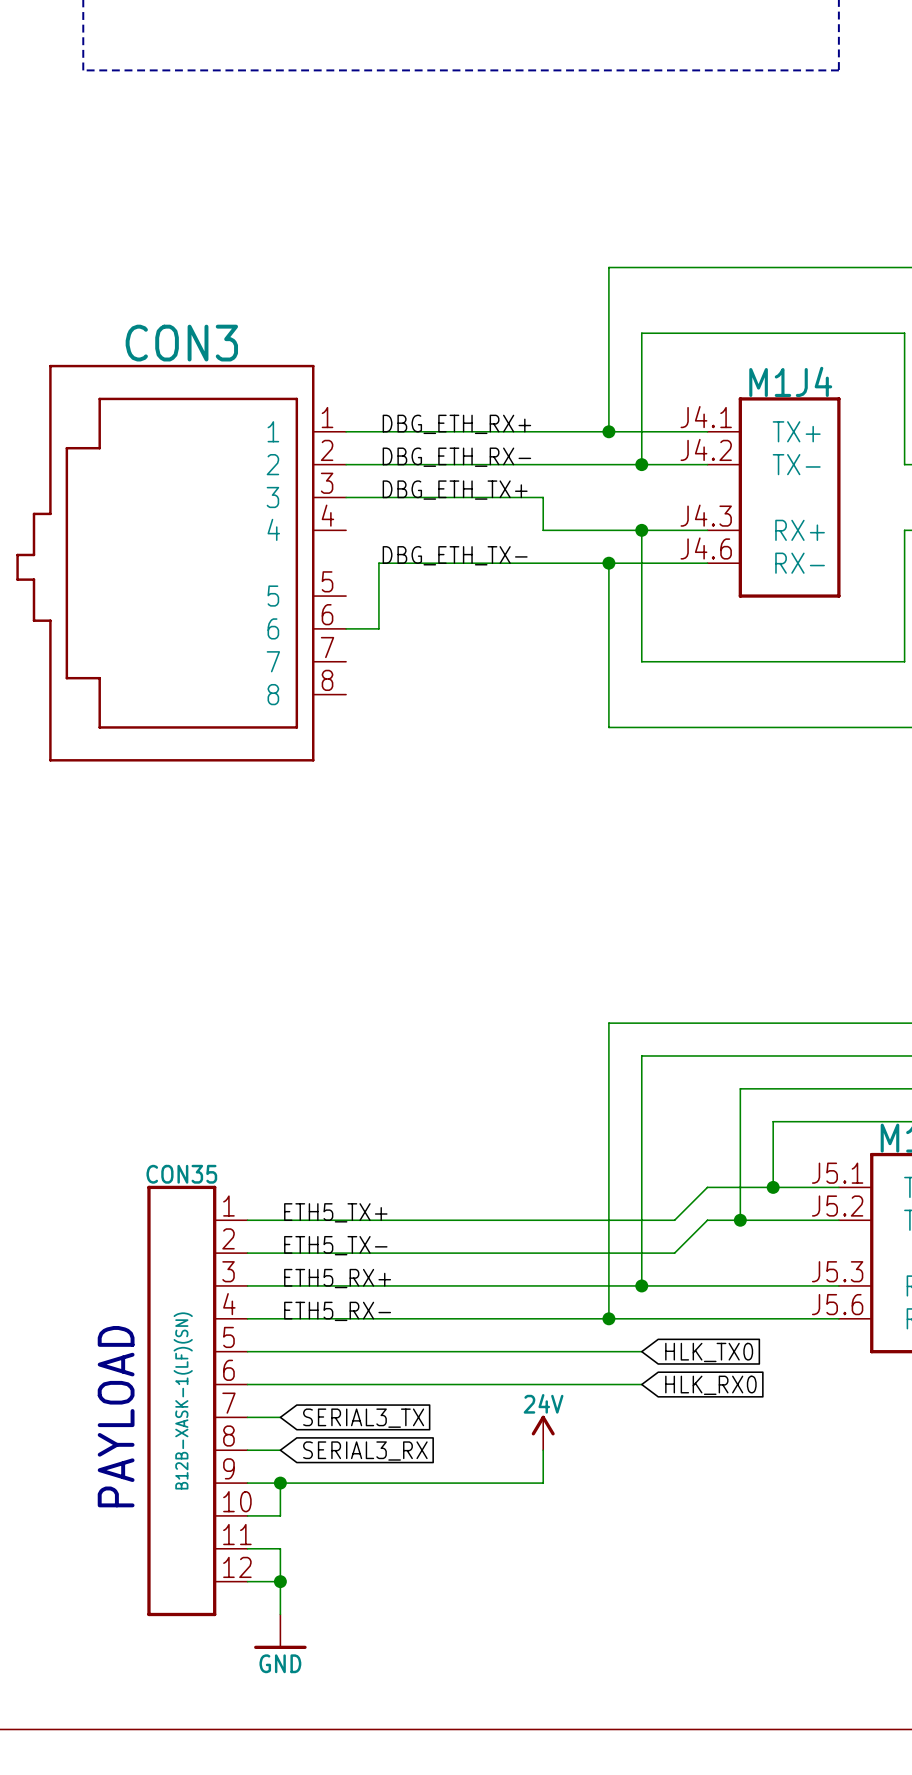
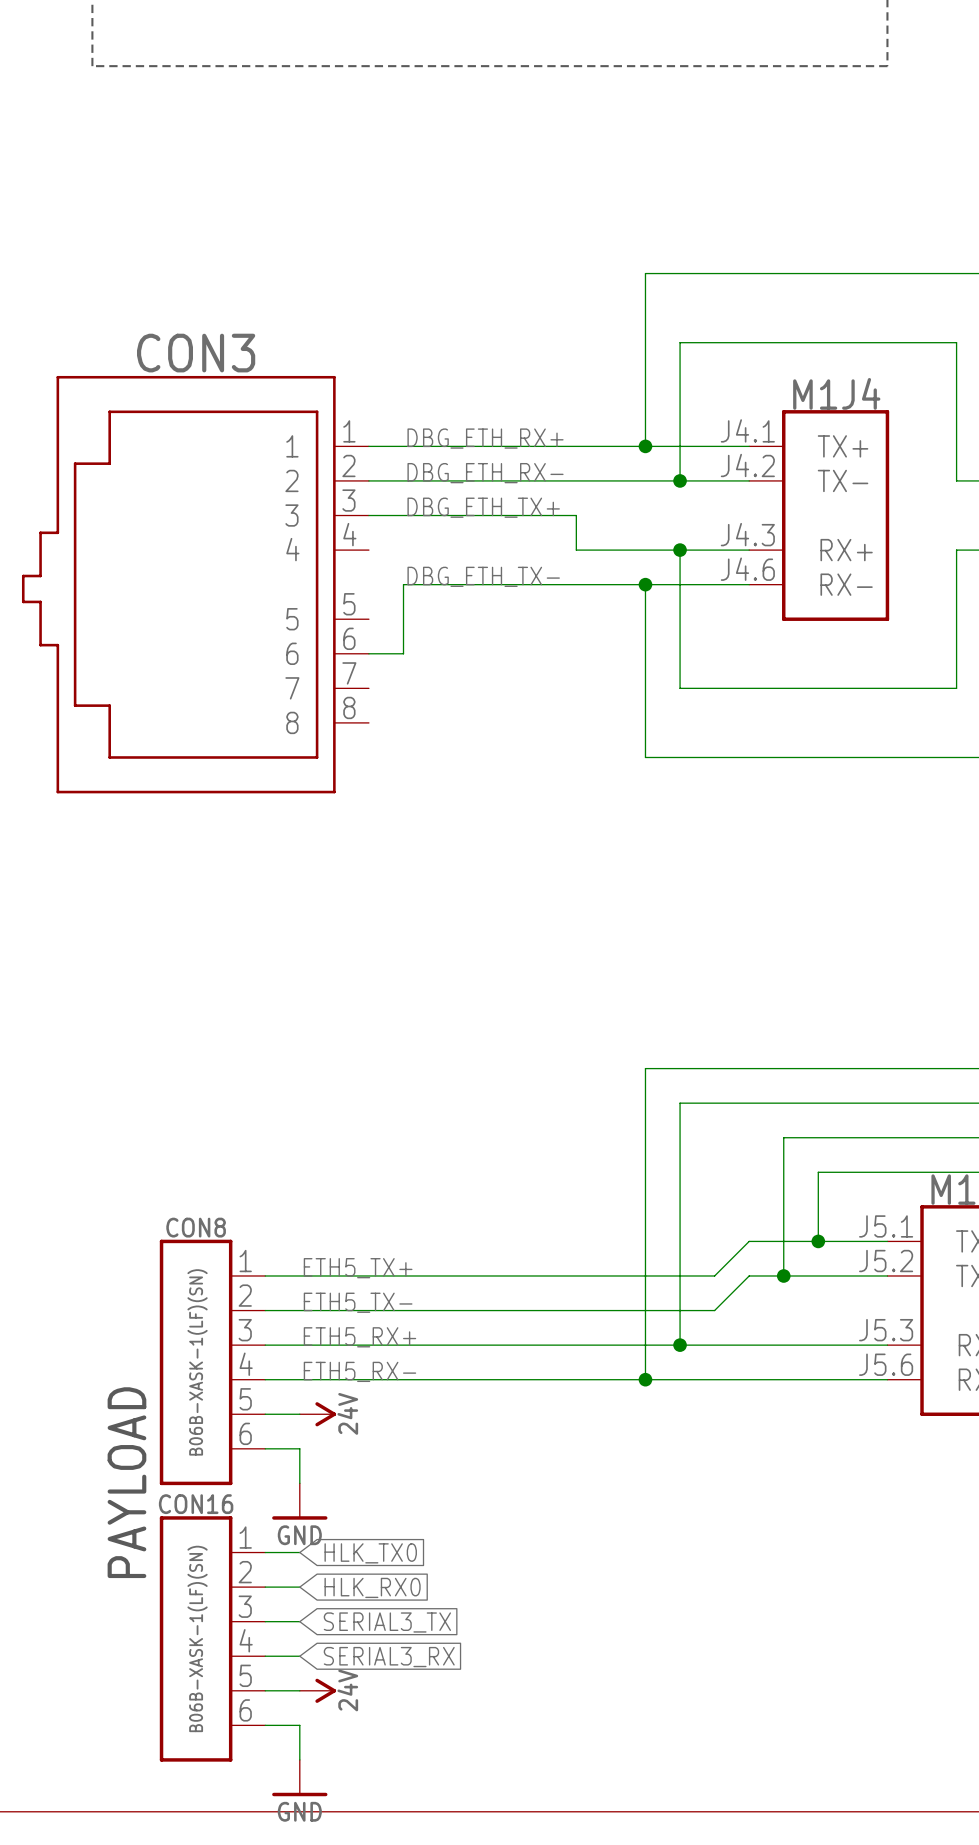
CON8: none -> (212, 1362)
wire: (280, 1351) (641, 1351) -> none
power symbol: none -> 24V (317, 1414)
global label: HLK_TX0 (709, 1352) -> none
wire: (280, 1384) (641, 1384) -> none
global label: HLK_RX0 (710, 1385) -> none
CON35: (197, 1400) -> none
wire: (247, 1417) (280, 1417) -> (299, 1448) (299, 1483)
global label position: SERIAL3_TX (363, 1418) -> SERIAL3_TX (387, 1622)
power symbol: 24V (543, 1432) -> none
power symbol: none -> GND (299, 1501)
wire: (543, 1450) (543, 1483) (280, 1483) (280, 1515) -> none
global label position: SERIAL3_RX (365, 1451) -> SERIAL3_RX (389, 1657)
junction: (280, 1483) -> none
global label: none -> HLK_TX0 (370, 1553)
global label: none -> HLK_RX0 (372, 1587)
wire: (280, 1548) (280, 1614) -> (265, 1690) (299, 1690)
CON16: none -> (212, 1638)
junction: (280, 1581) -> none
power symbol: none -> 24V (317, 1690)
power symbol position: GND (280, 1631) -> GND (299, 1778)
wire: none -> (265, 1725) (299, 1725) (299, 1759)

